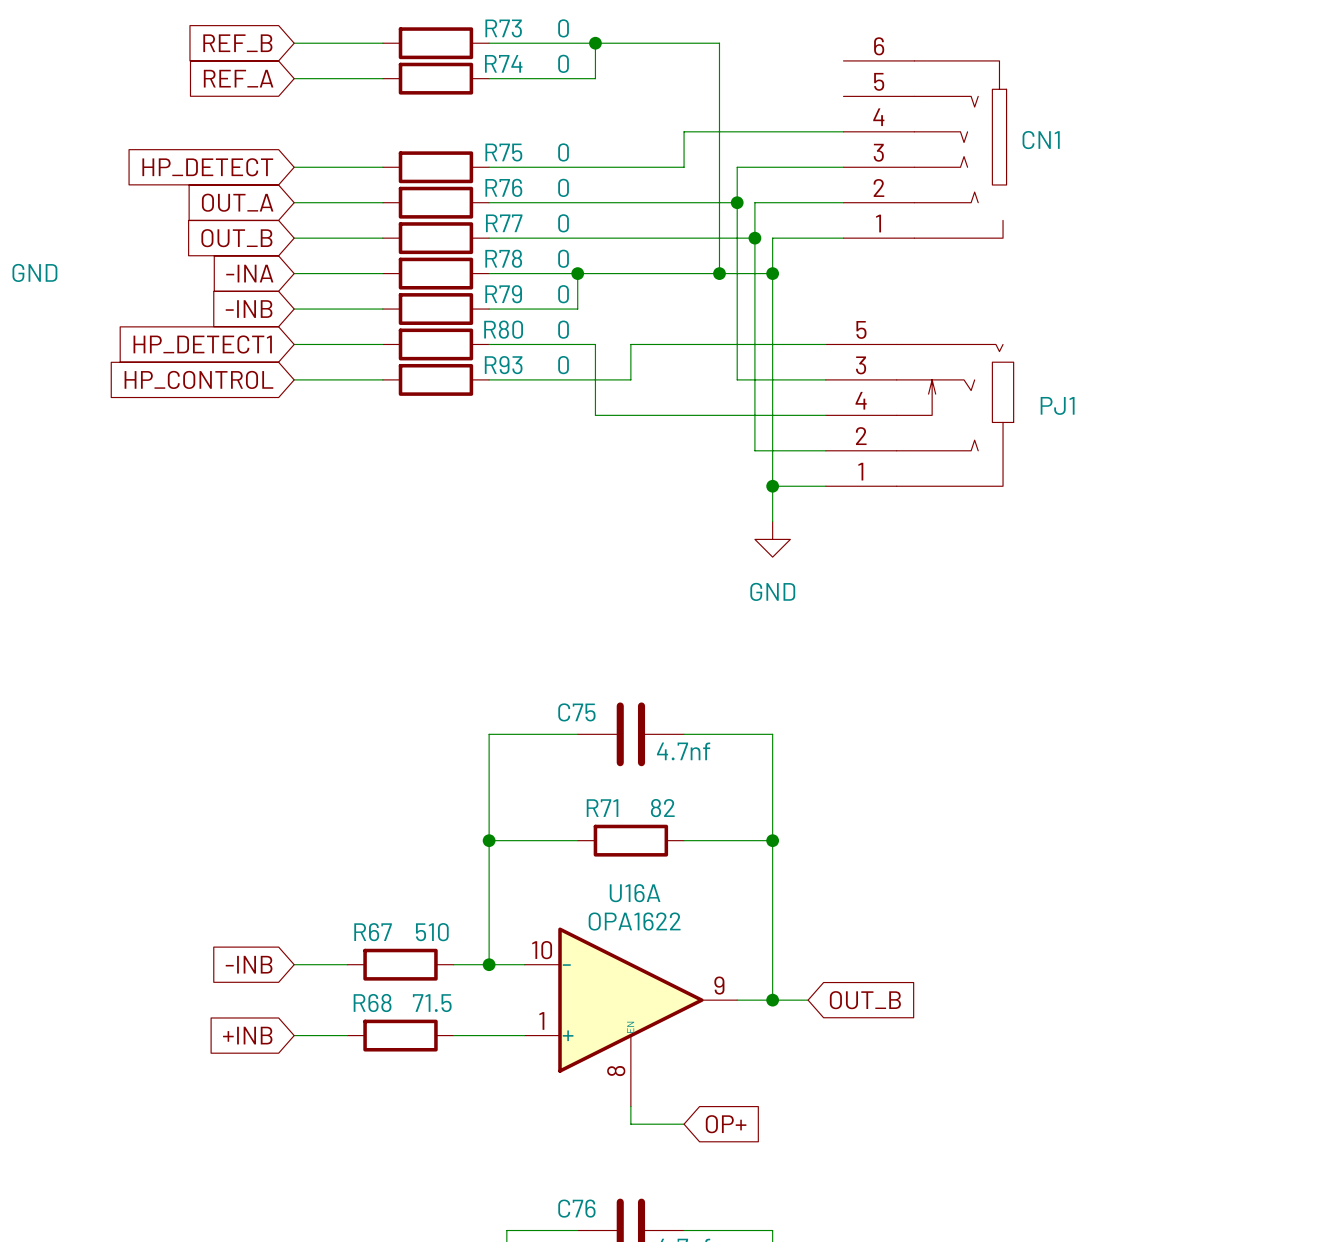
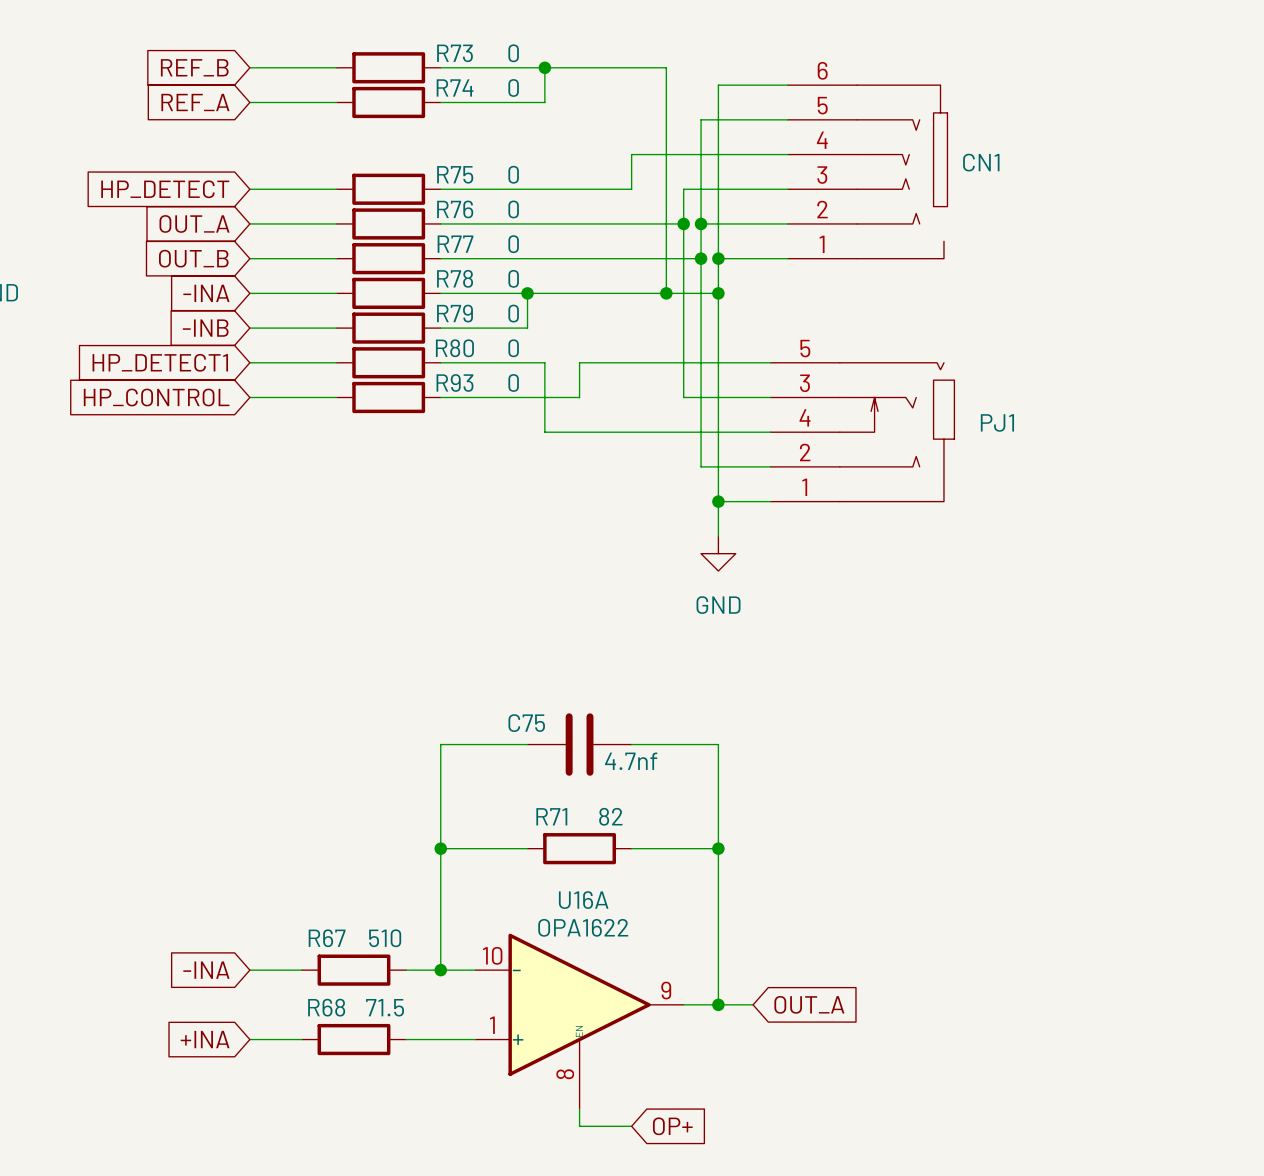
wire: none -> (787, 85) (718, 85) (718, 258)
wire: none -> (787, 119) (701, 119) (701, 223)
junction: none -> (701, 223)
junction: none -> (718, 258)
global label: -INB (249, 964) -> -INA (206, 970)
global label: OUT_B (865, 1000) -> OUT_A (809, 1004)
global label: +INB (247, 1035) -> +INA (205, 1039)

